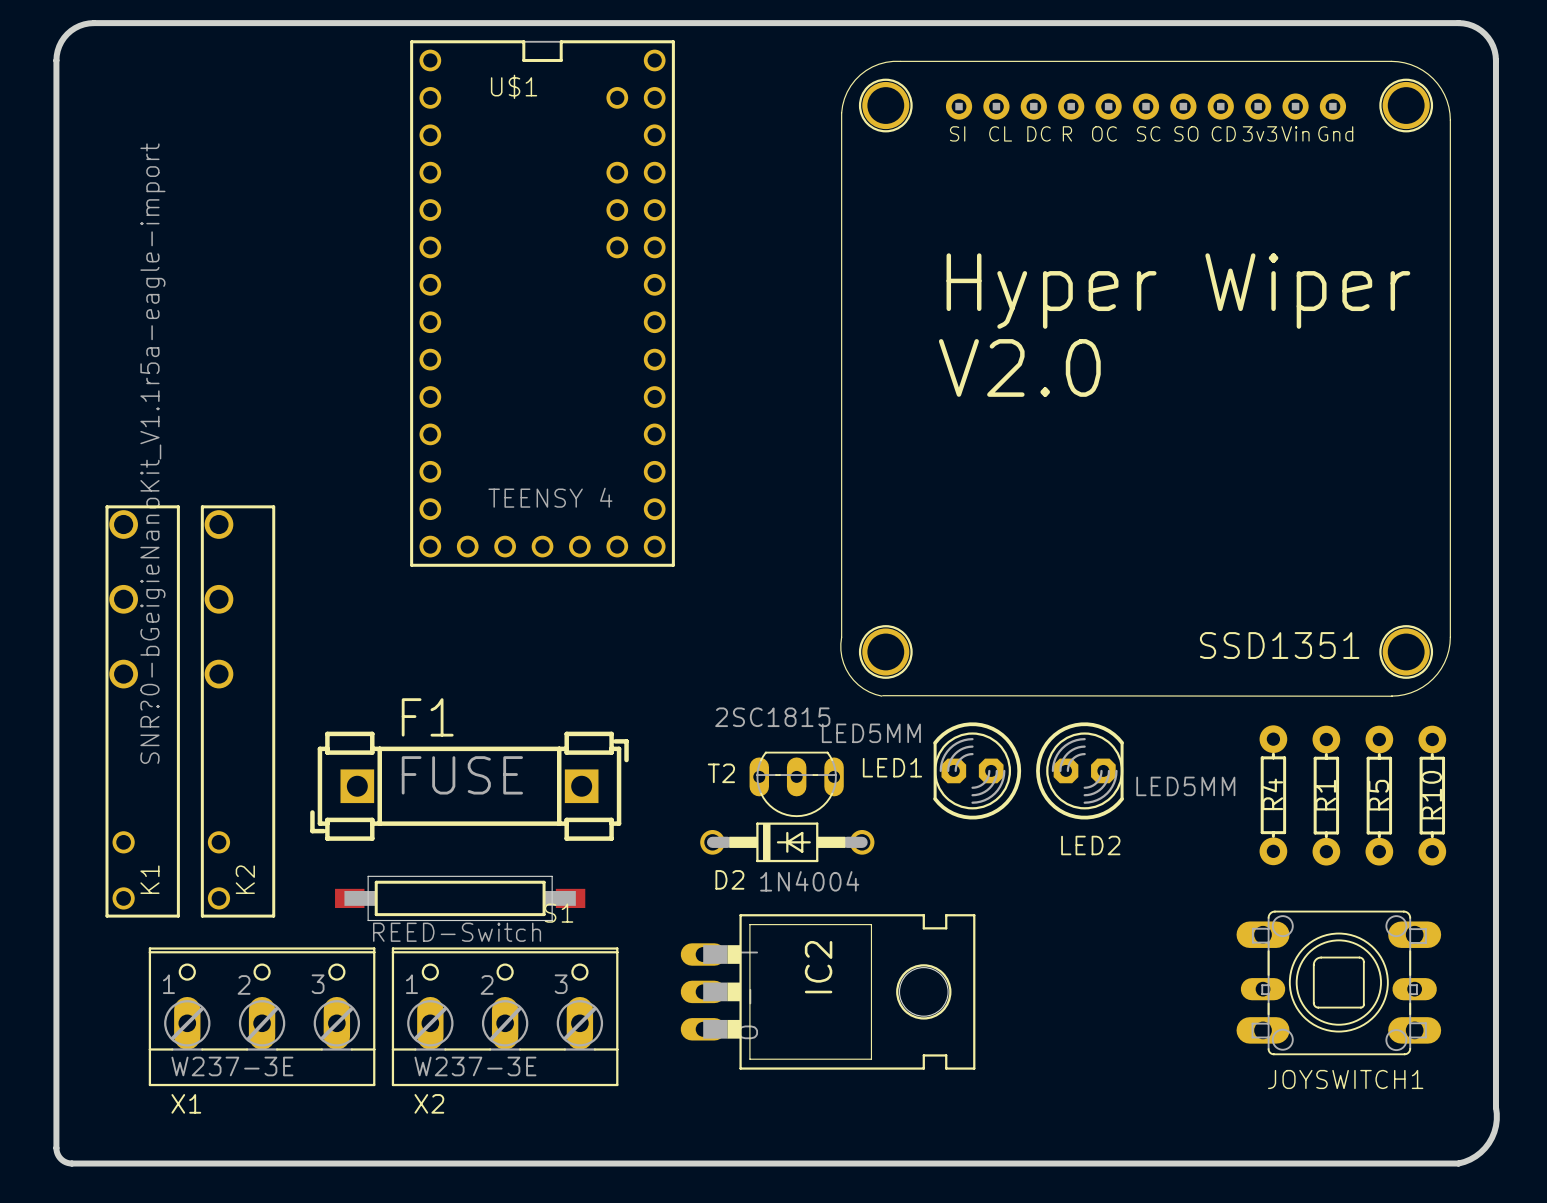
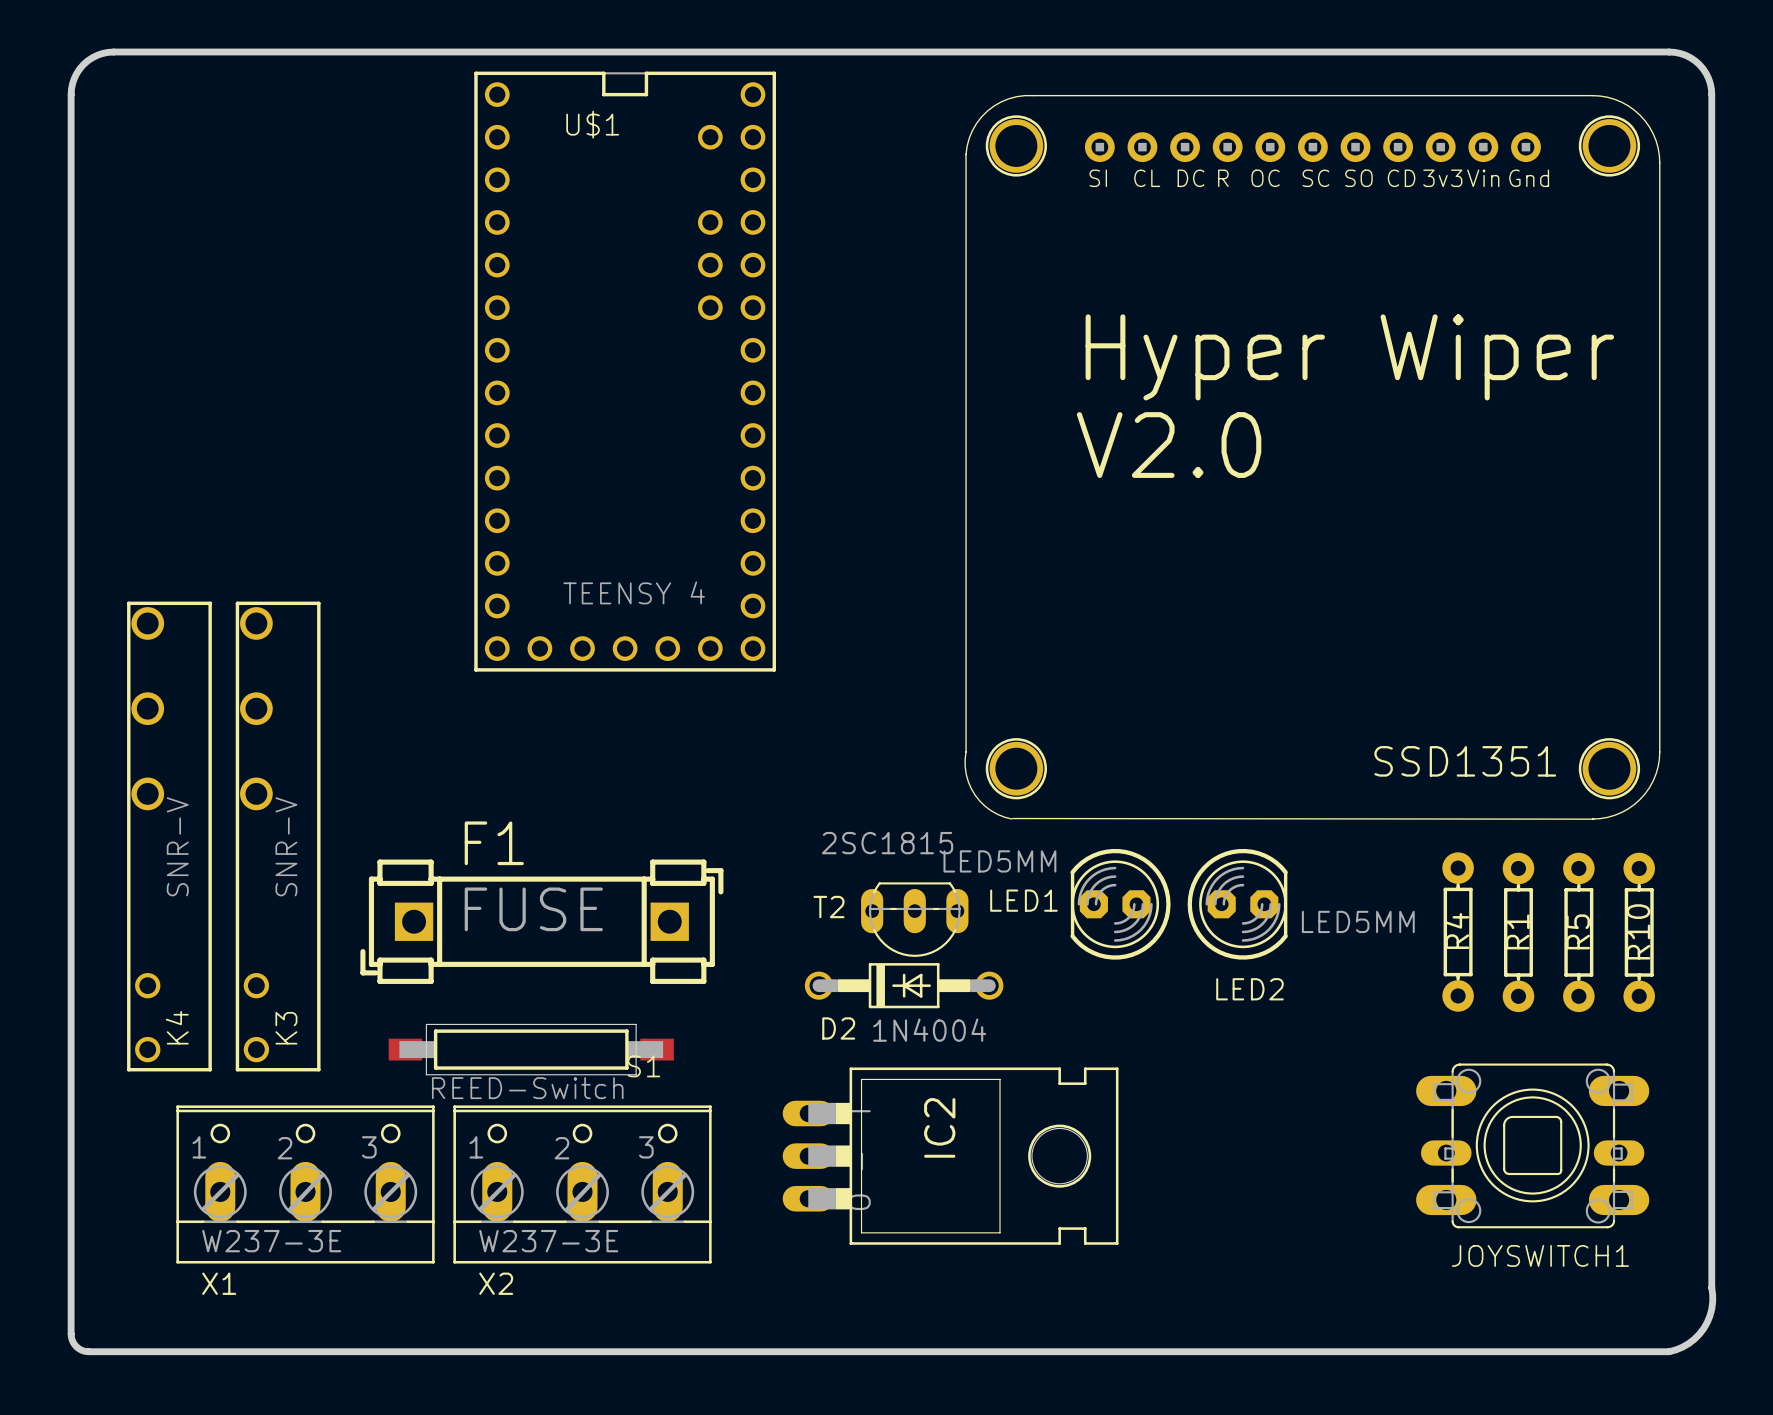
K1 value: SNR?0-bGeigieNanoKit_V1.1r5a-eagle-import (152, 453) -> SNR-V (177, 846)
K2 value: none -> SNR-V (286, 846)
K1 name: K1 (149, 879) -> K4 (177, 1027)
K2 name: K2 (245, 879) -> K3 (286, 1028)

